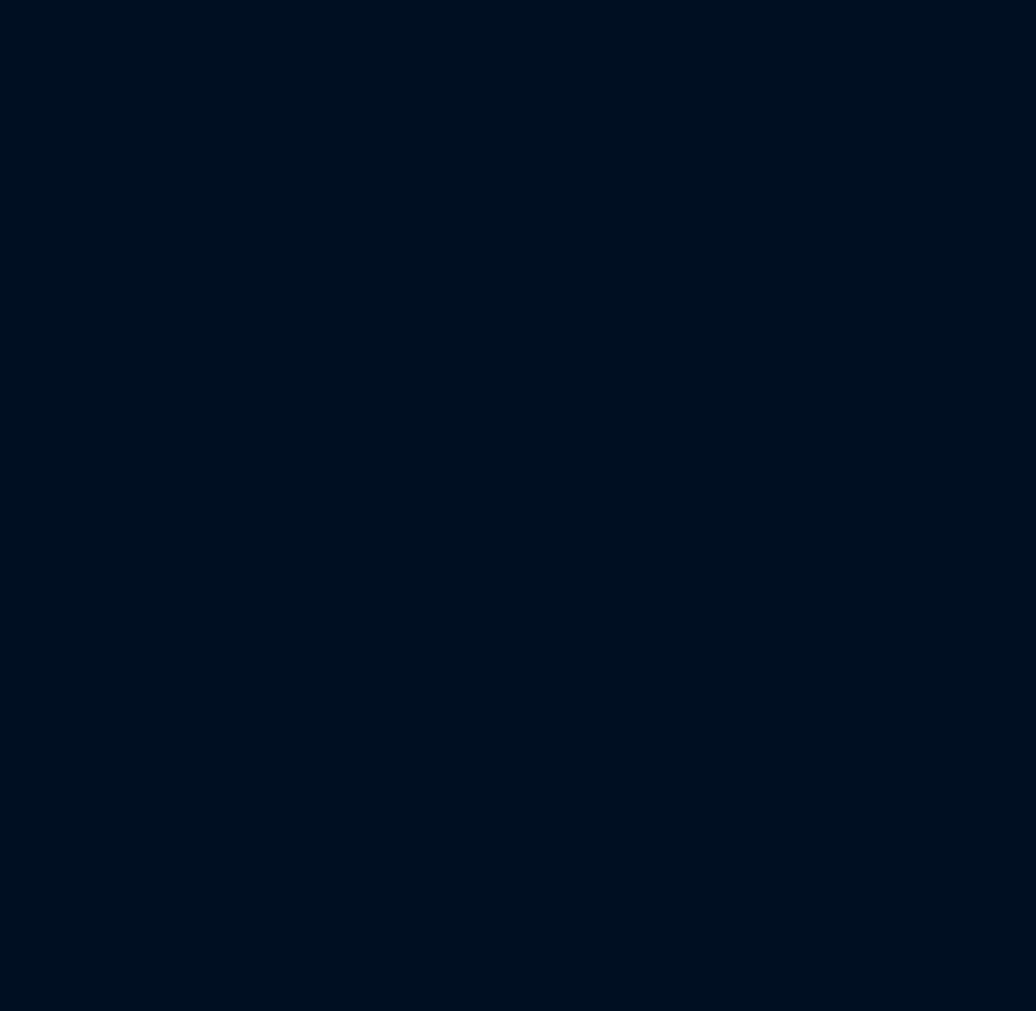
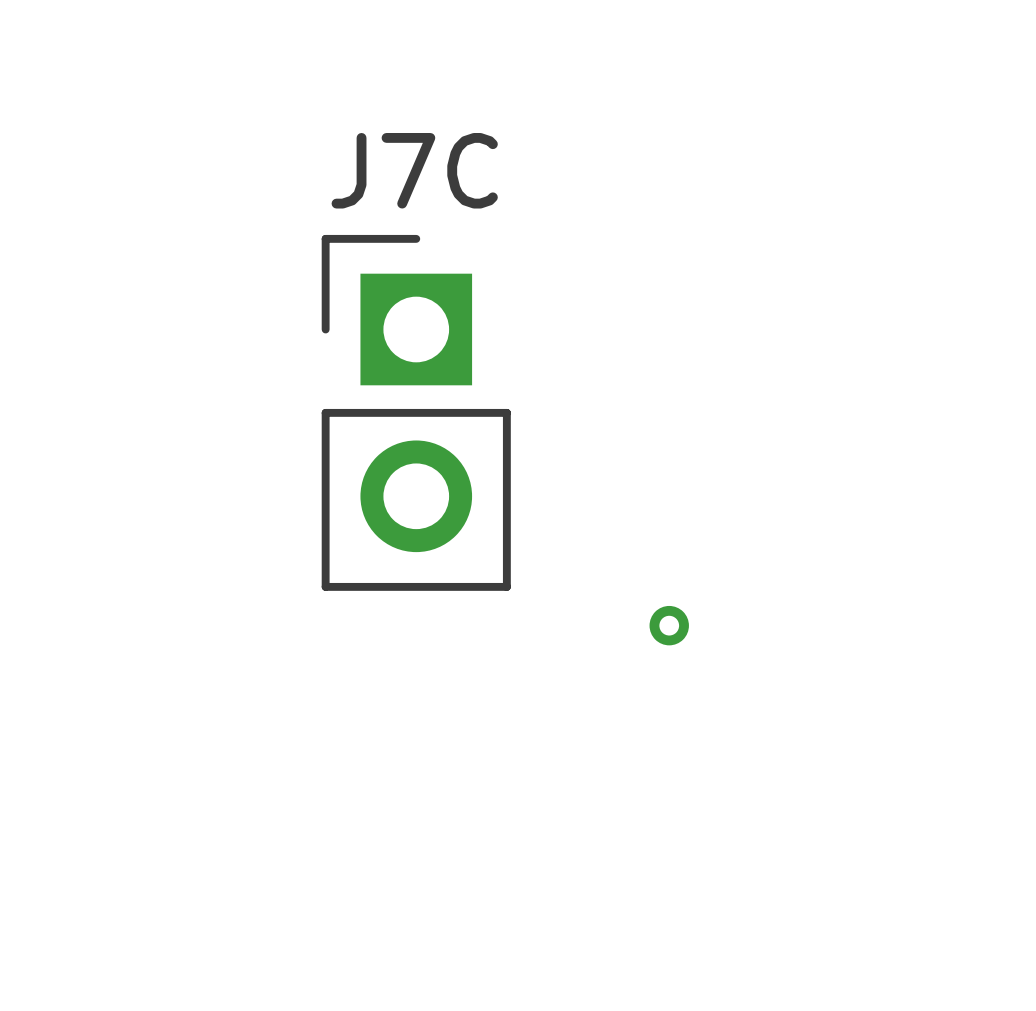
J7C: none -> (416, 412)
via: none -> (669, 625)

